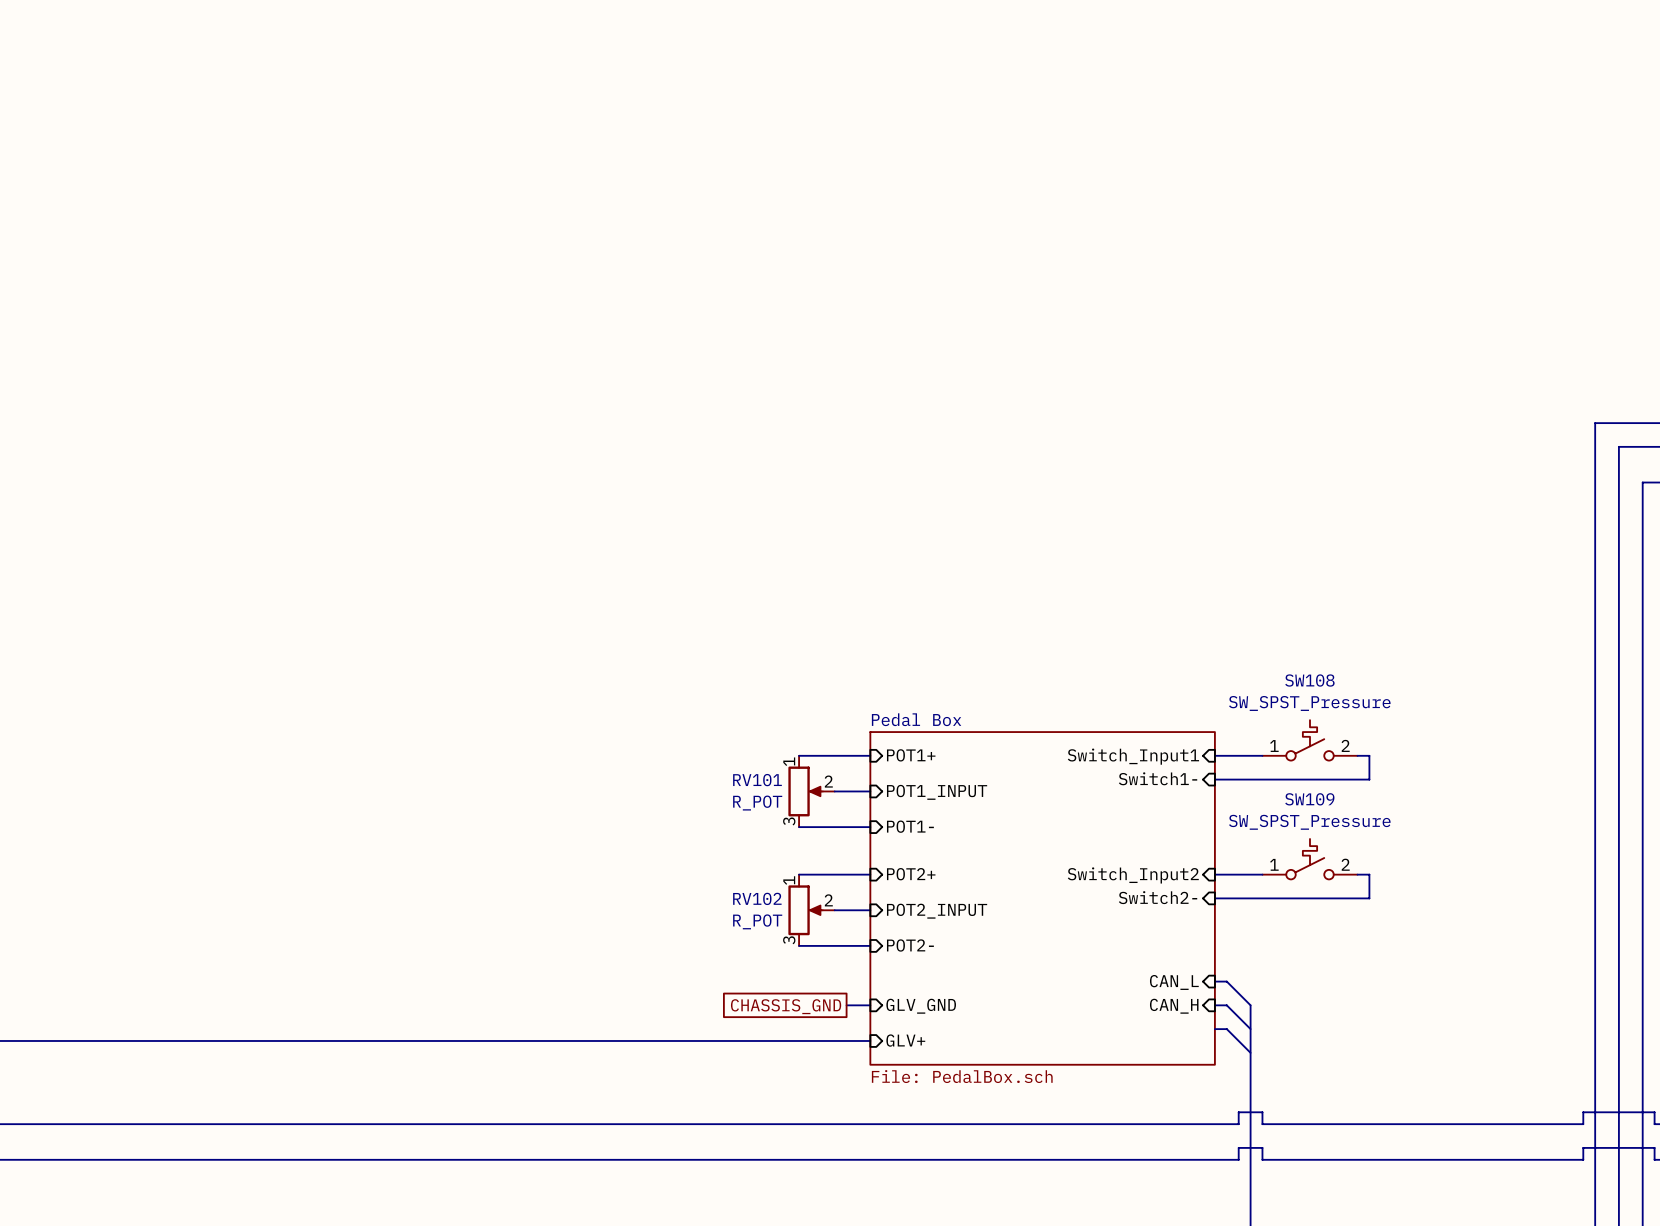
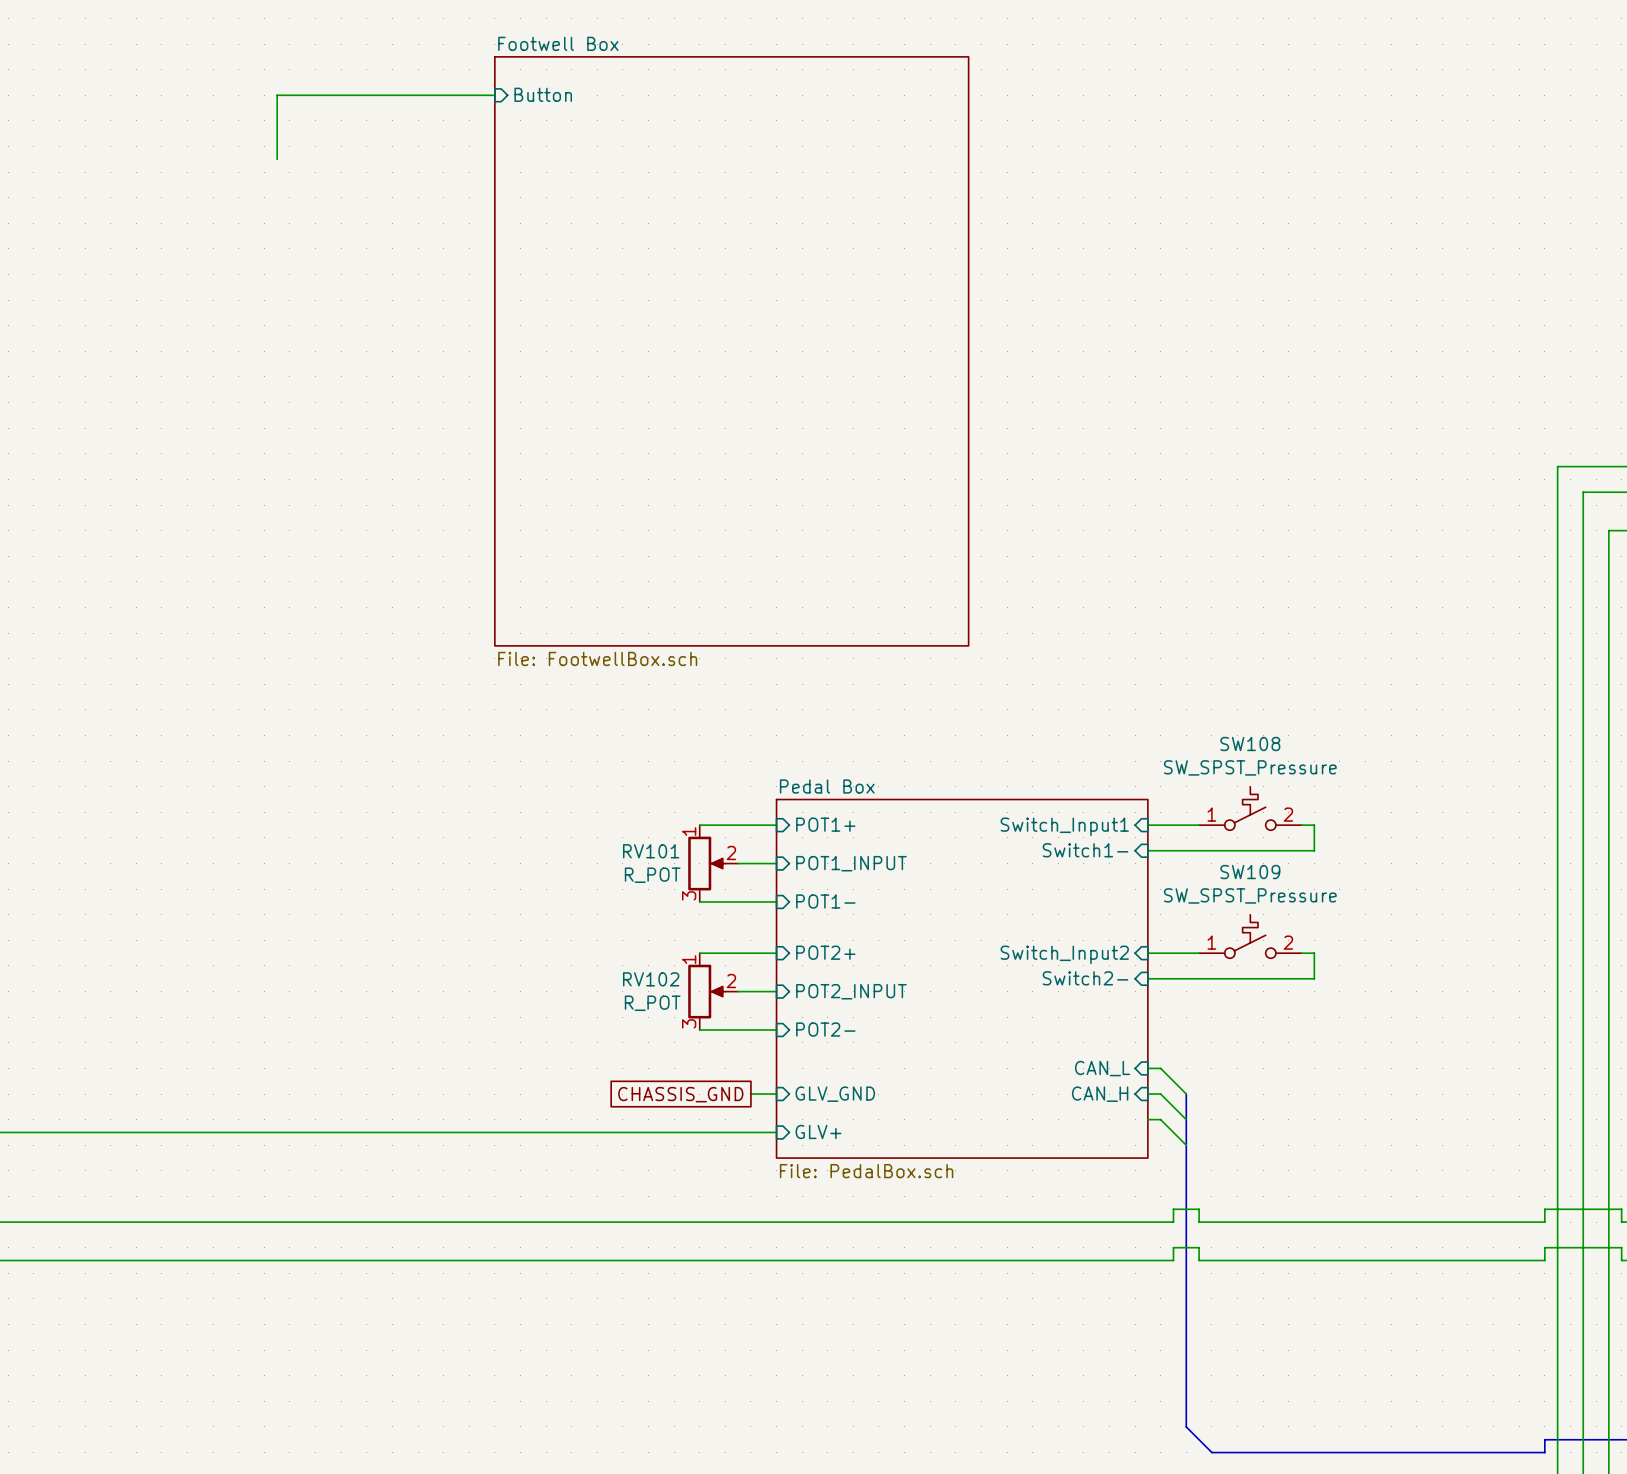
wire: none -> (494, 95) (277, 95) (277, 159)
sheet pin: none -> Button (543, 94)
sheet Footwell Box: none -> File: FootwellBox.sch (731, 351)

